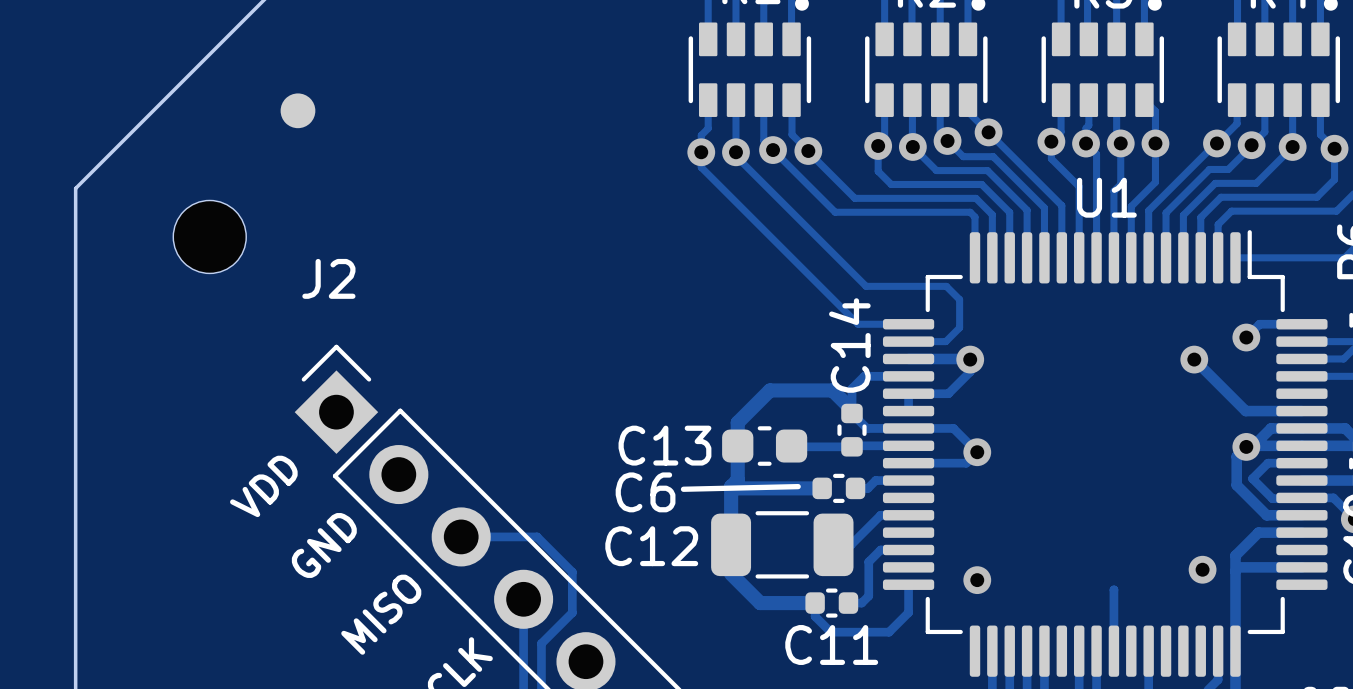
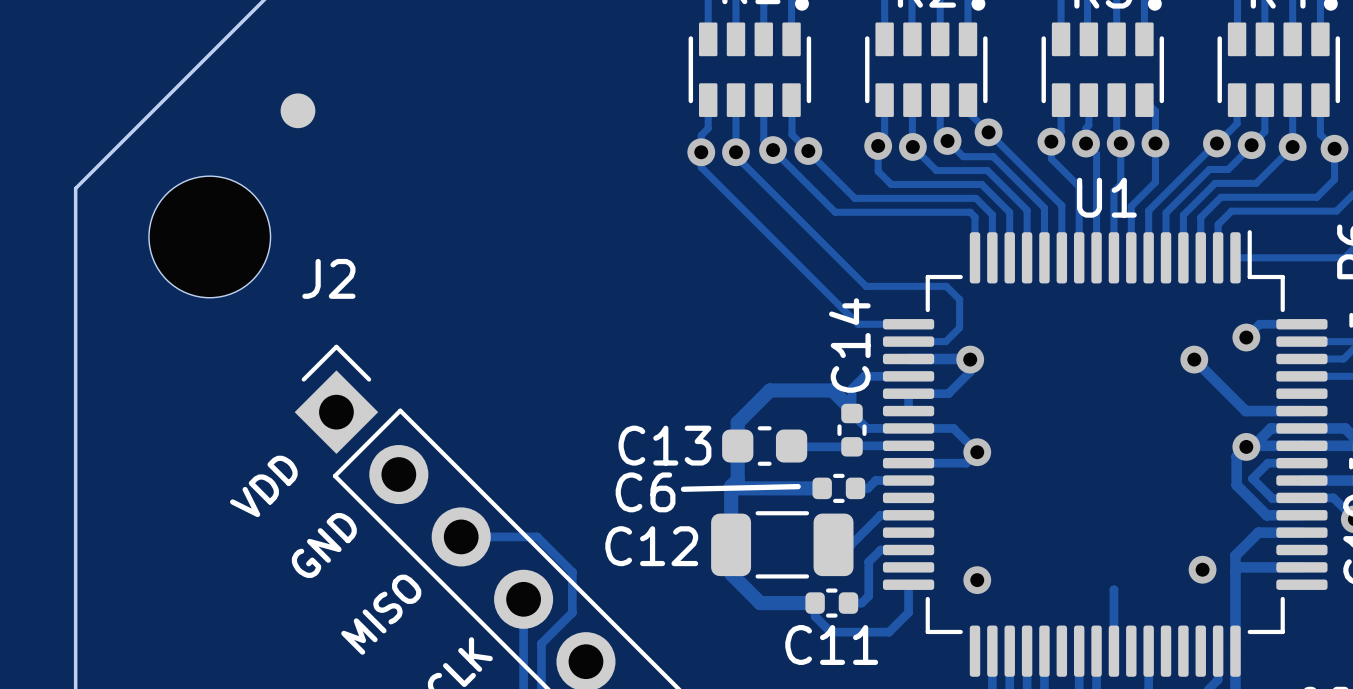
part footprint: [173, 200, 247, 274] -> [148, 176, 271, 298]

